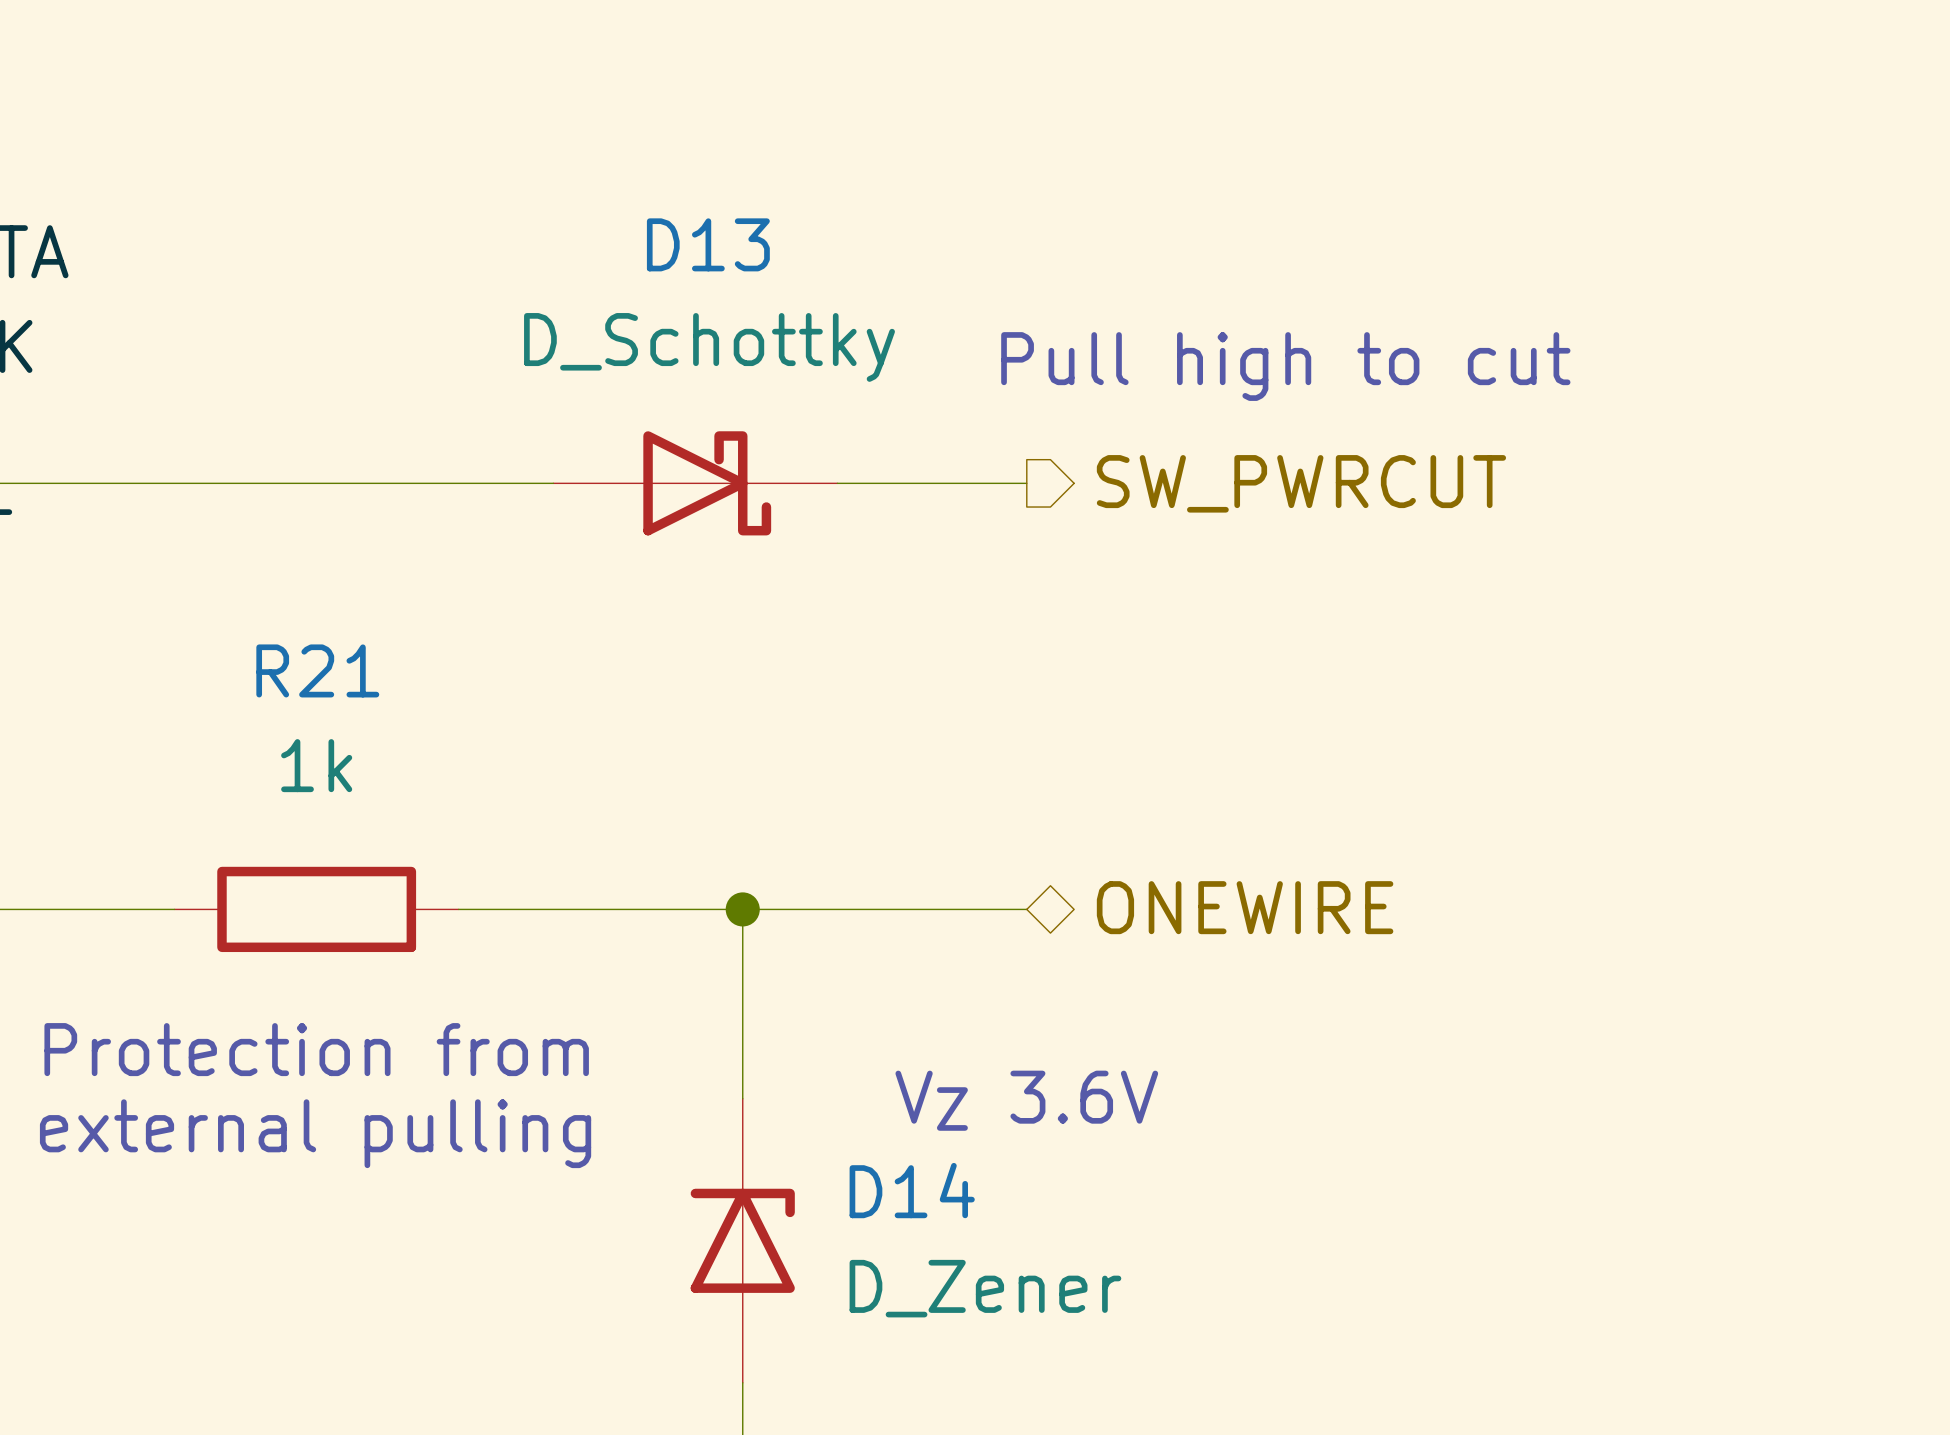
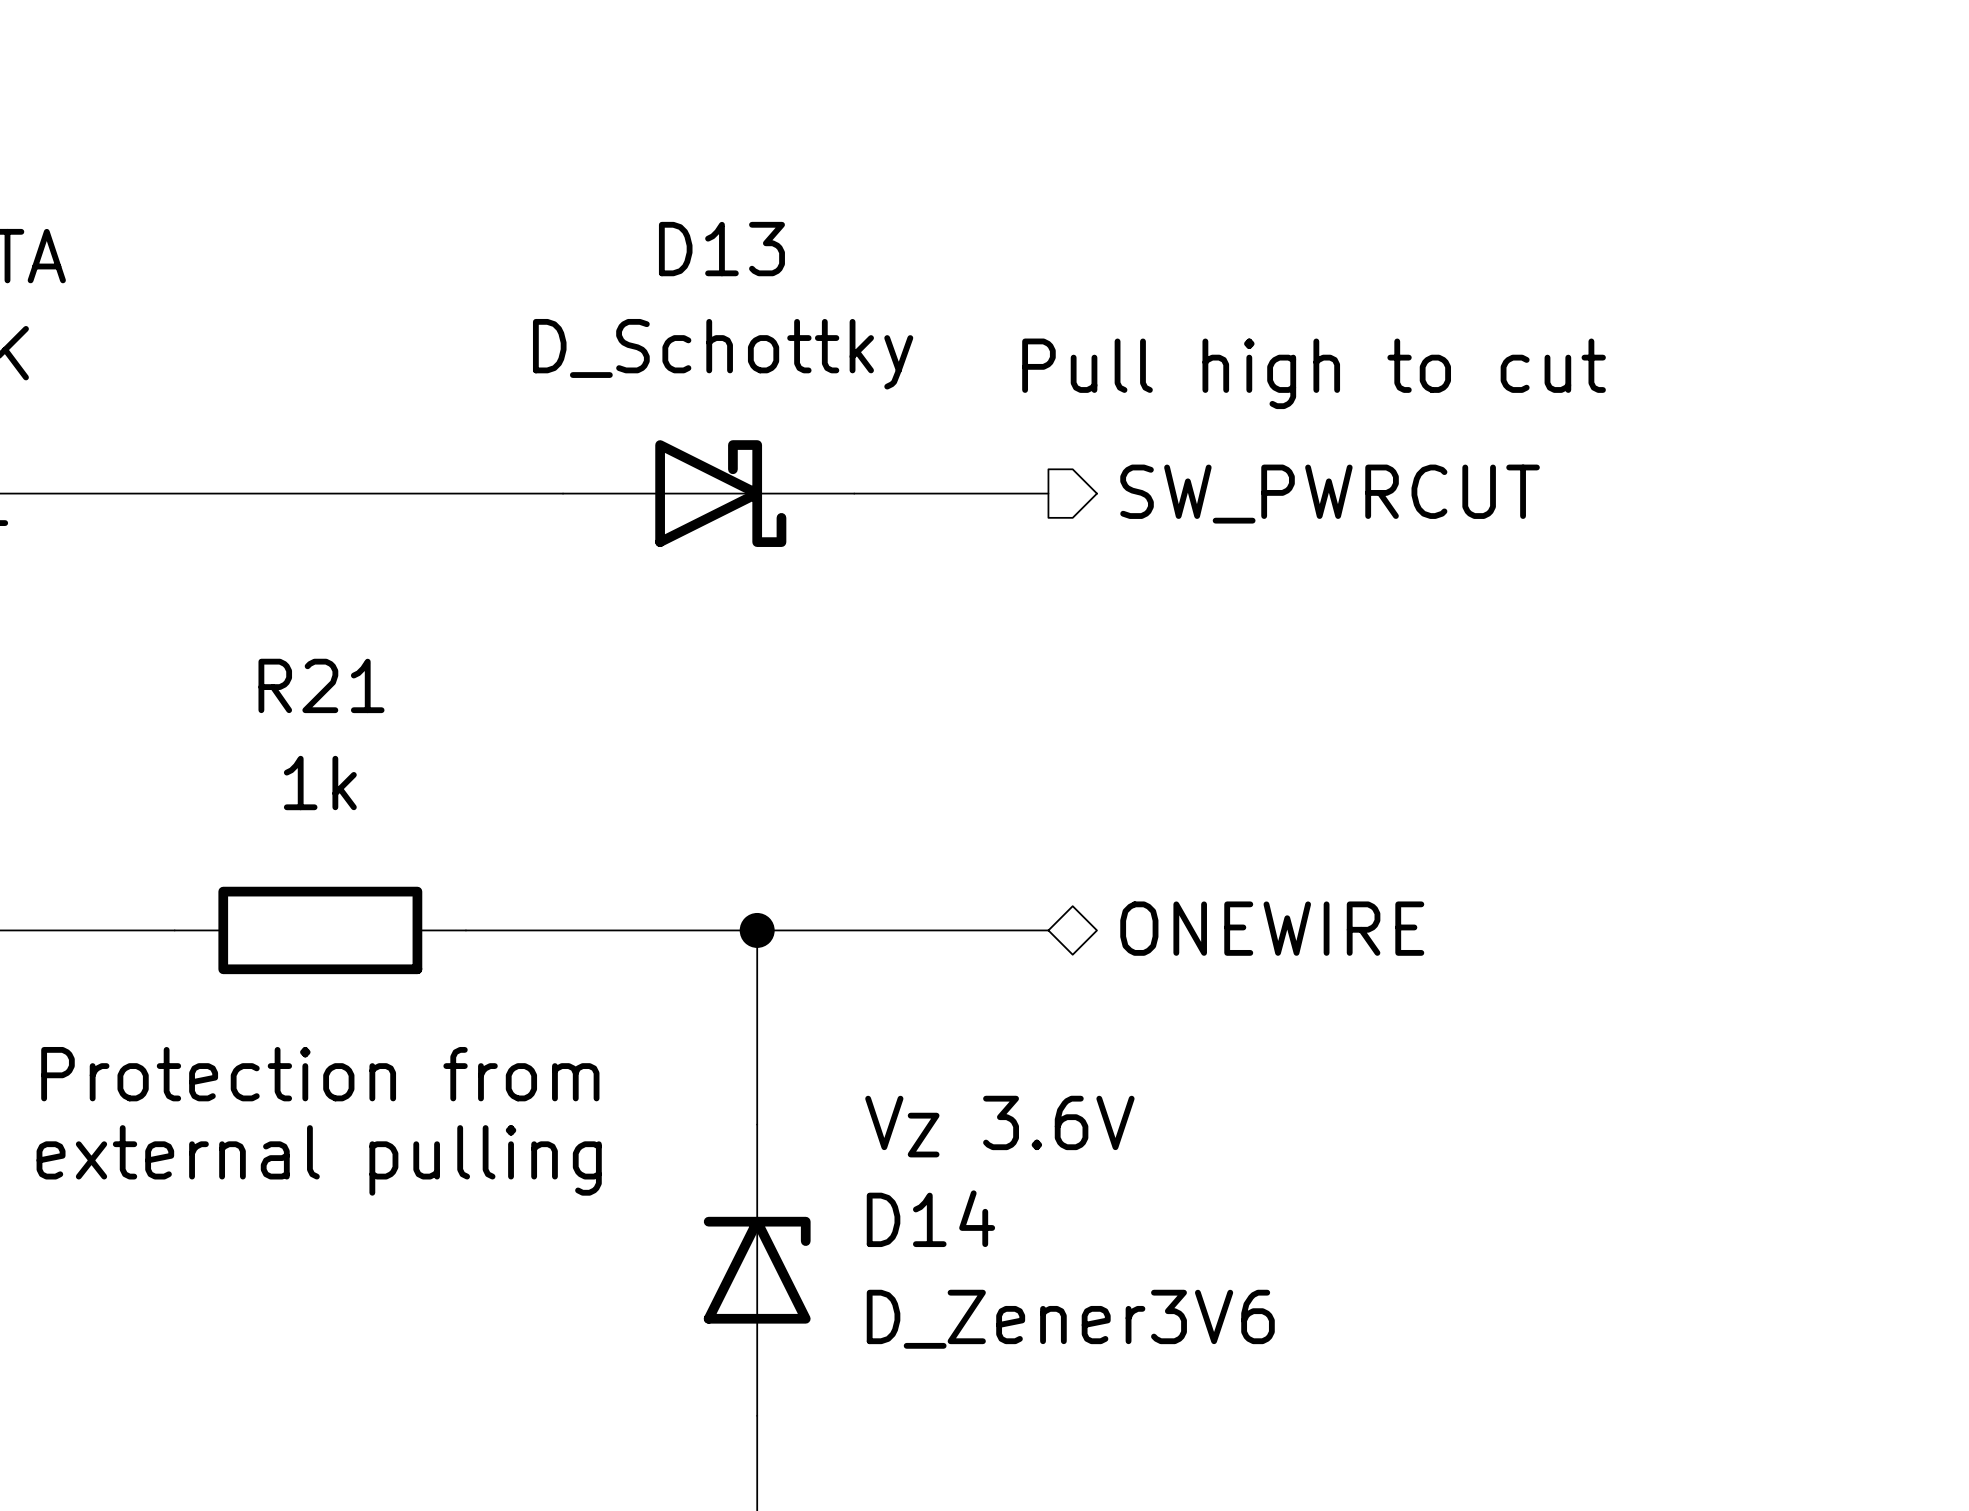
text position: VZ 3.6V (1026, 1100) -> VZ 3.6V (999, 1126)
D14 value: D_Zener (985, 1288) -> D_Zener3V6 (1070, 1319)

